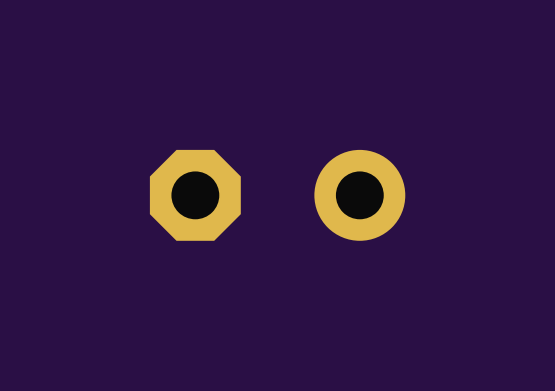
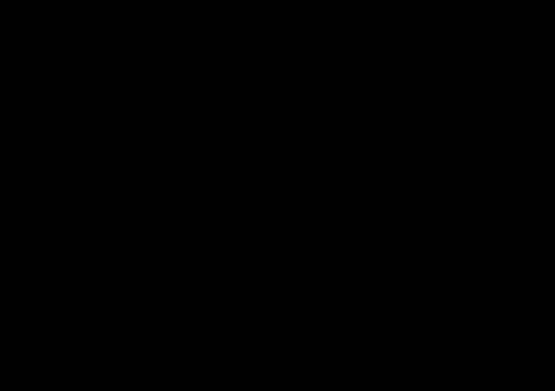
part: (277, 195) -> none

